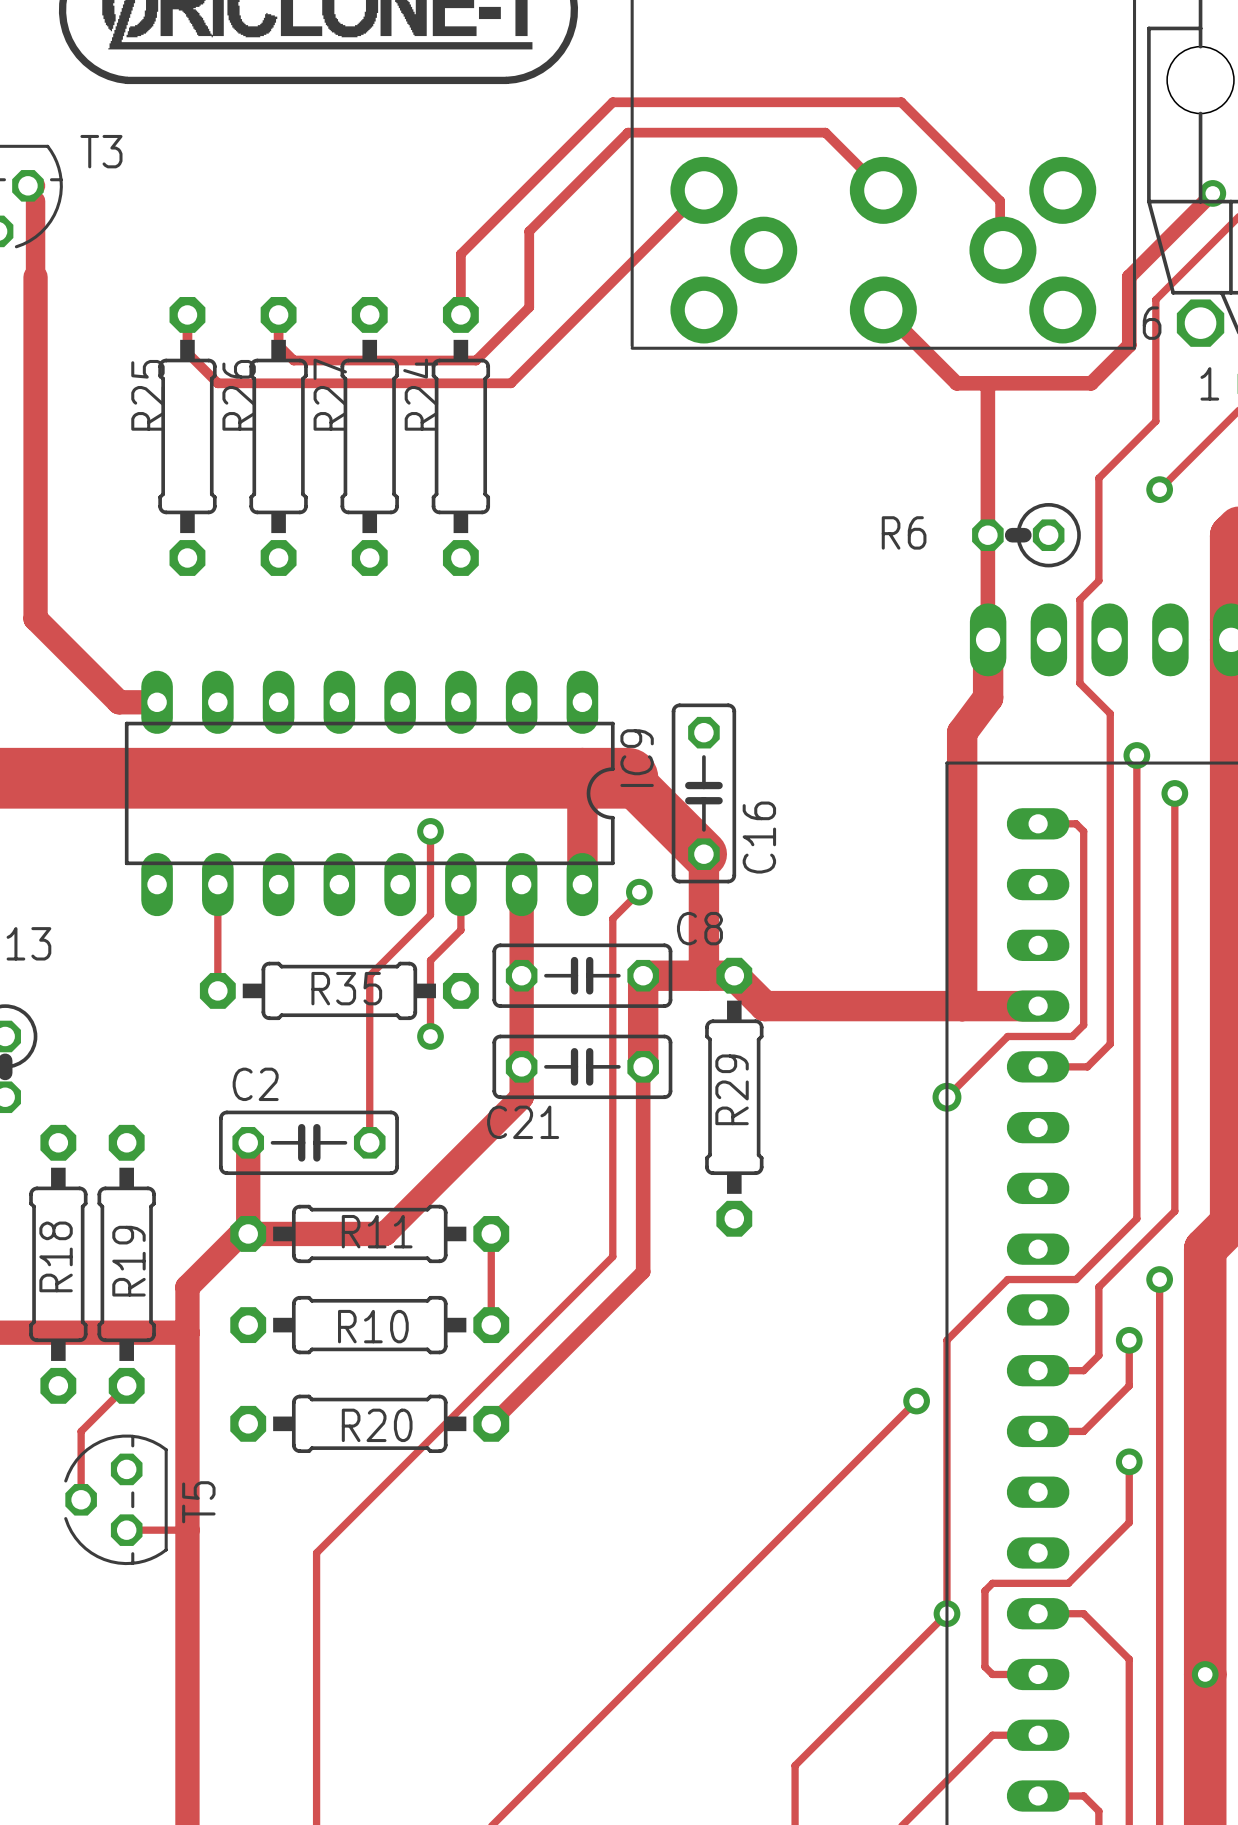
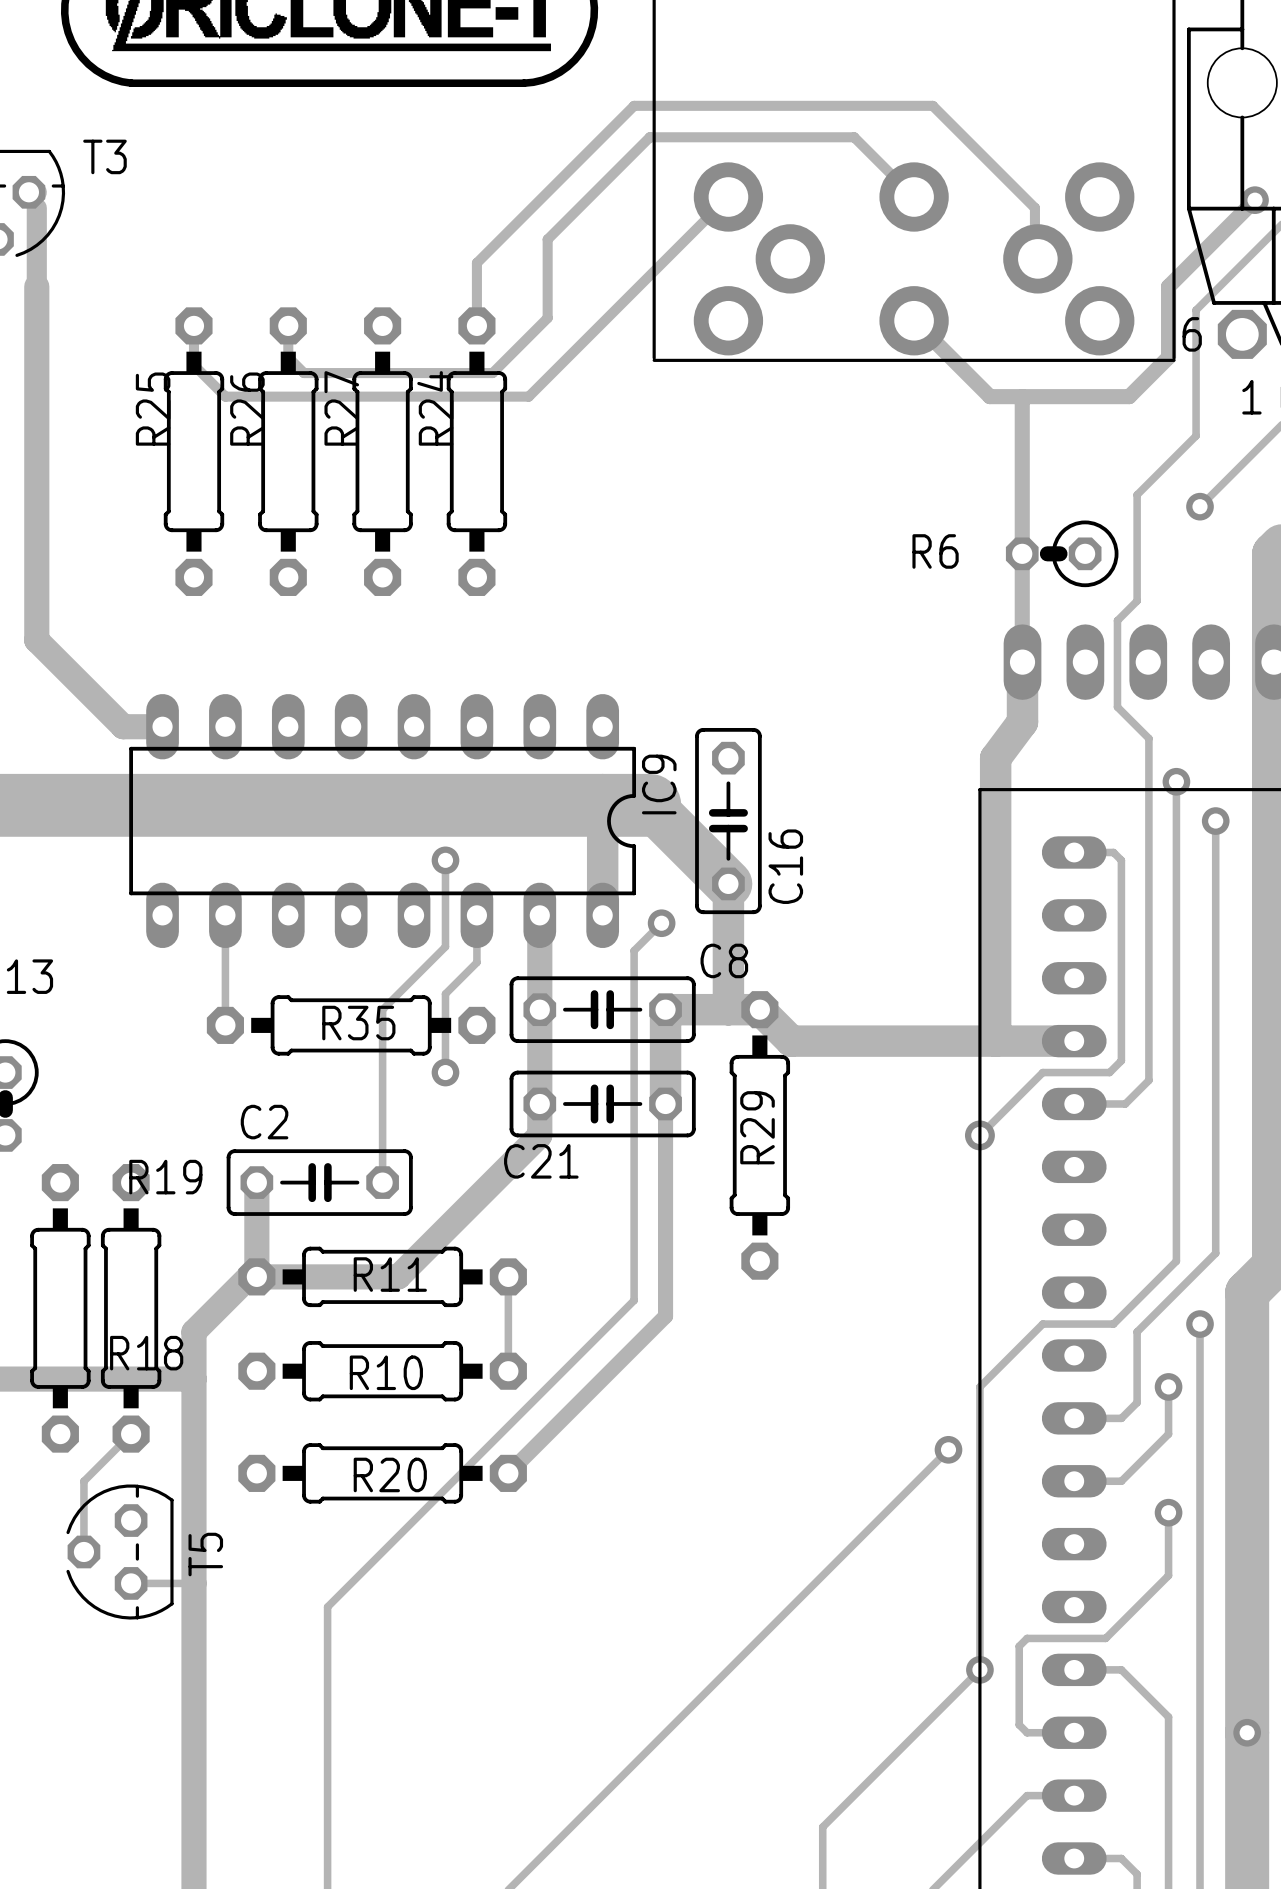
R18 name rotation: 0° (56, 1256) -> 90° clockwise (146, 1353)
R18 name position: R18 (56, 1256) -> R18 (146, 1353)
R19 name rotation: 0° (128, 1261) -> 90° clockwise (165, 1177)
R19 name position: R19 (128, 1261) -> R19 (165, 1177)

